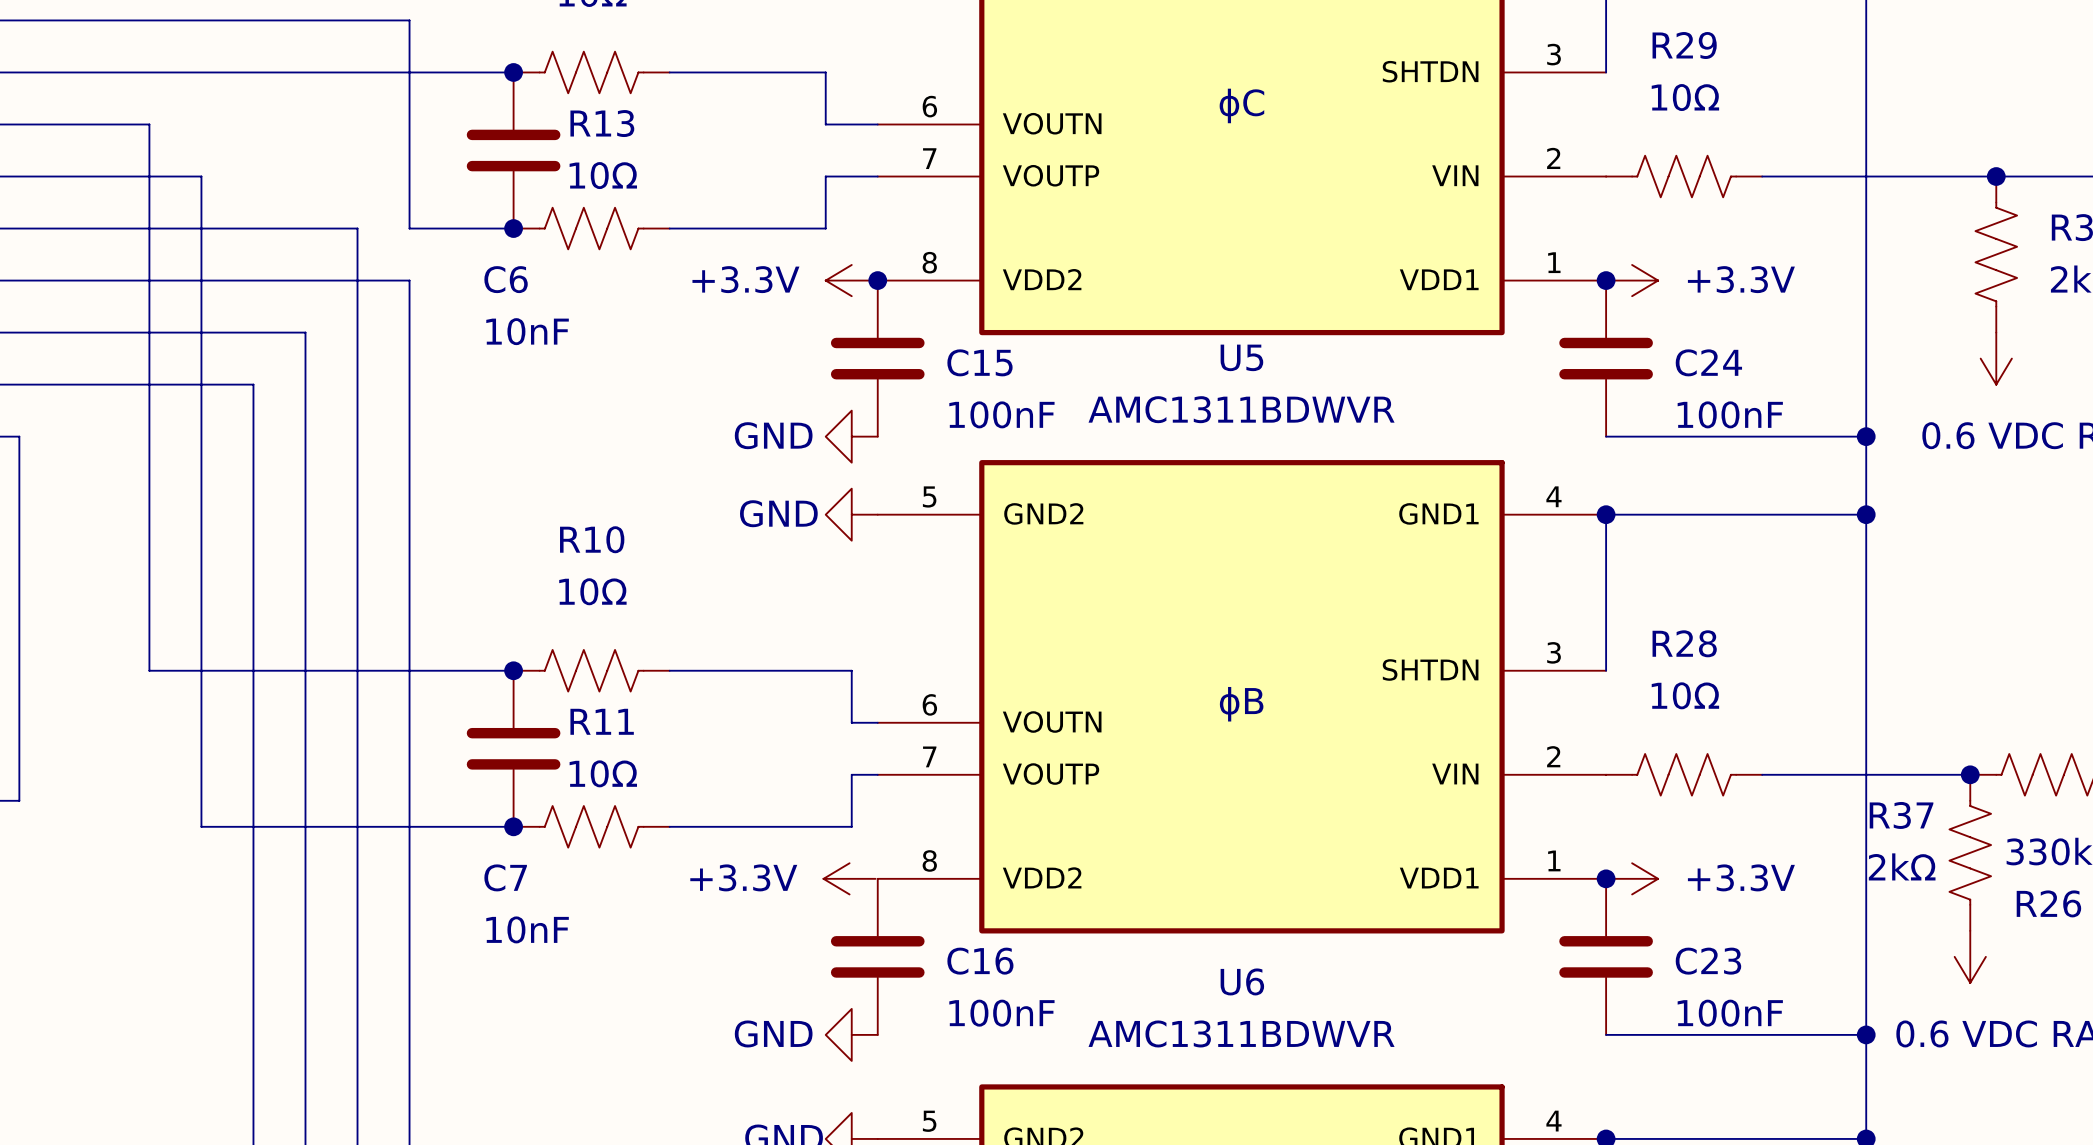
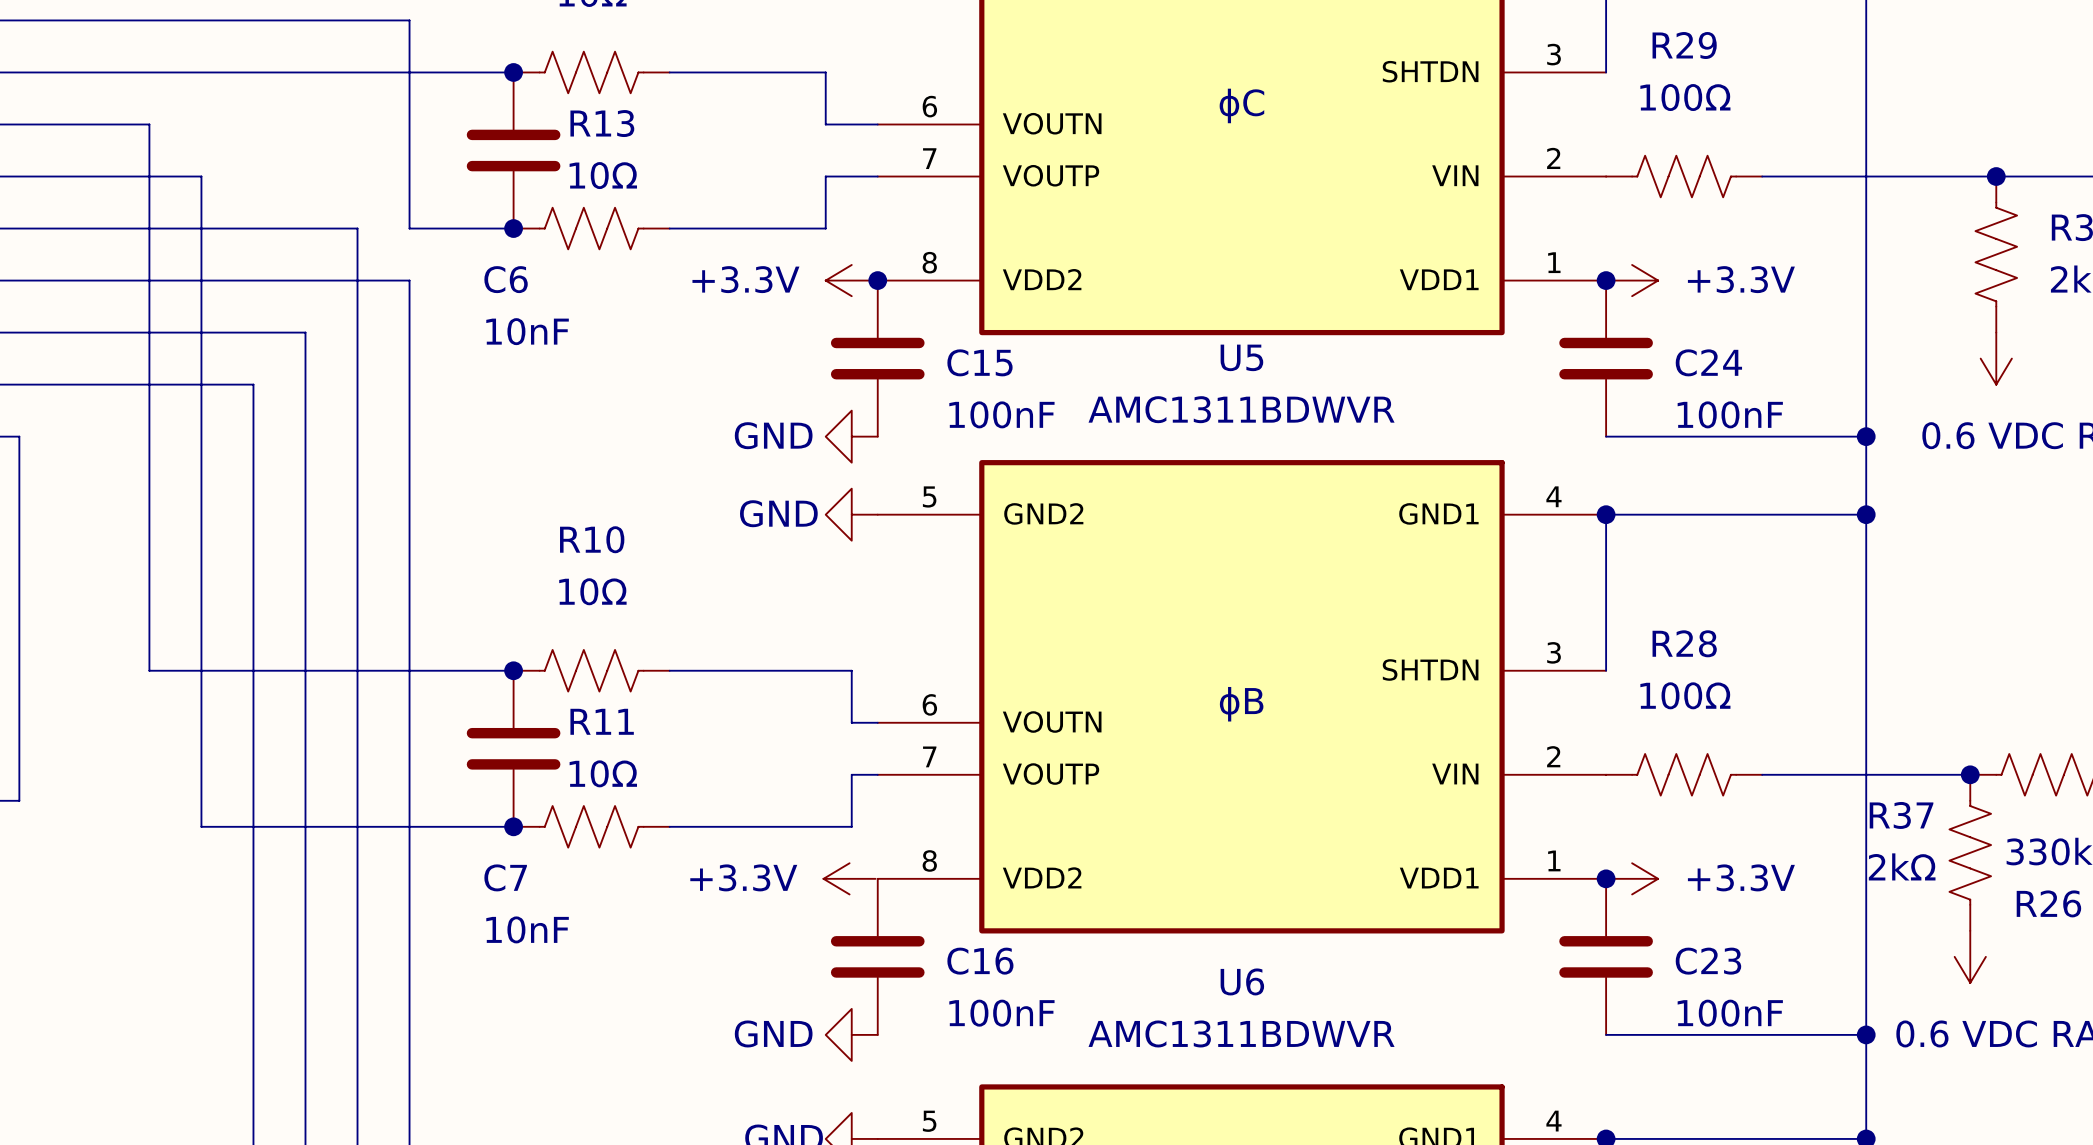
R29 value: 10Ω (1685, 97) -> 100Ω (1685, 97)
R28 value: 10Ω (1685, 695) -> 100Ω (1685, 695)

